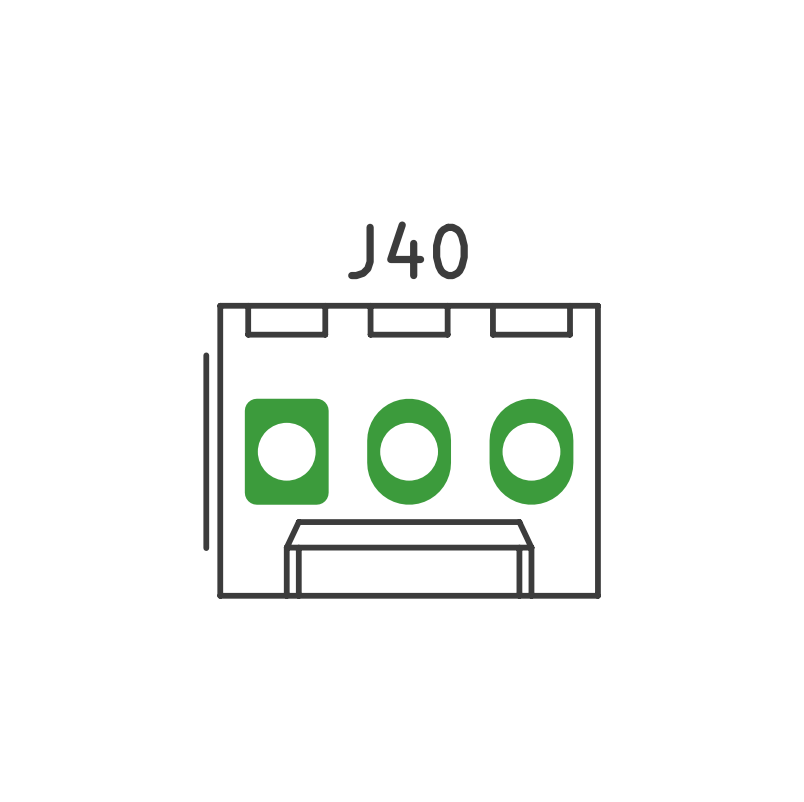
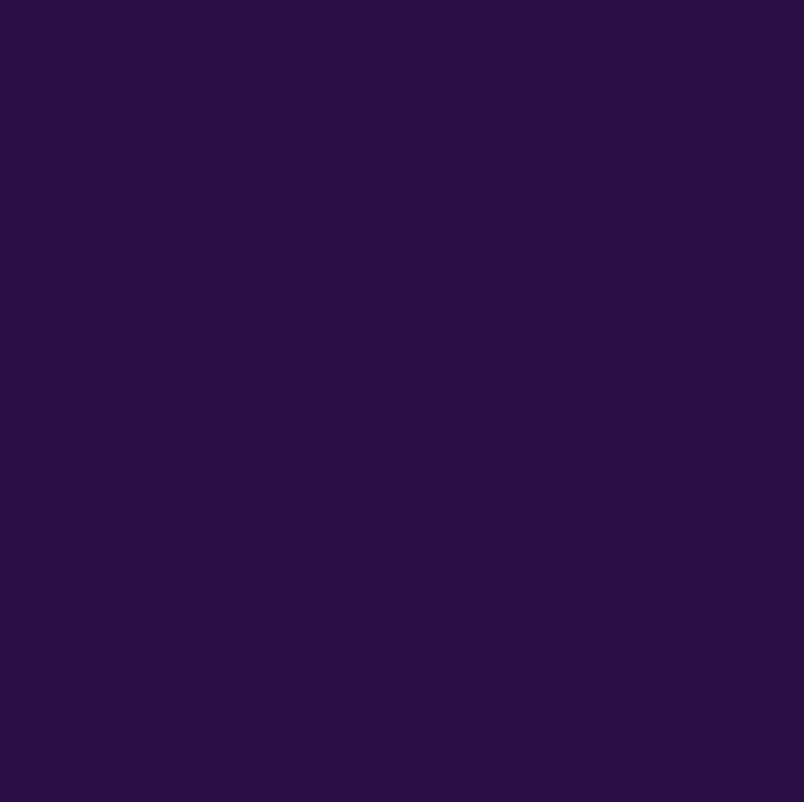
J40: (402, 450) -> none

